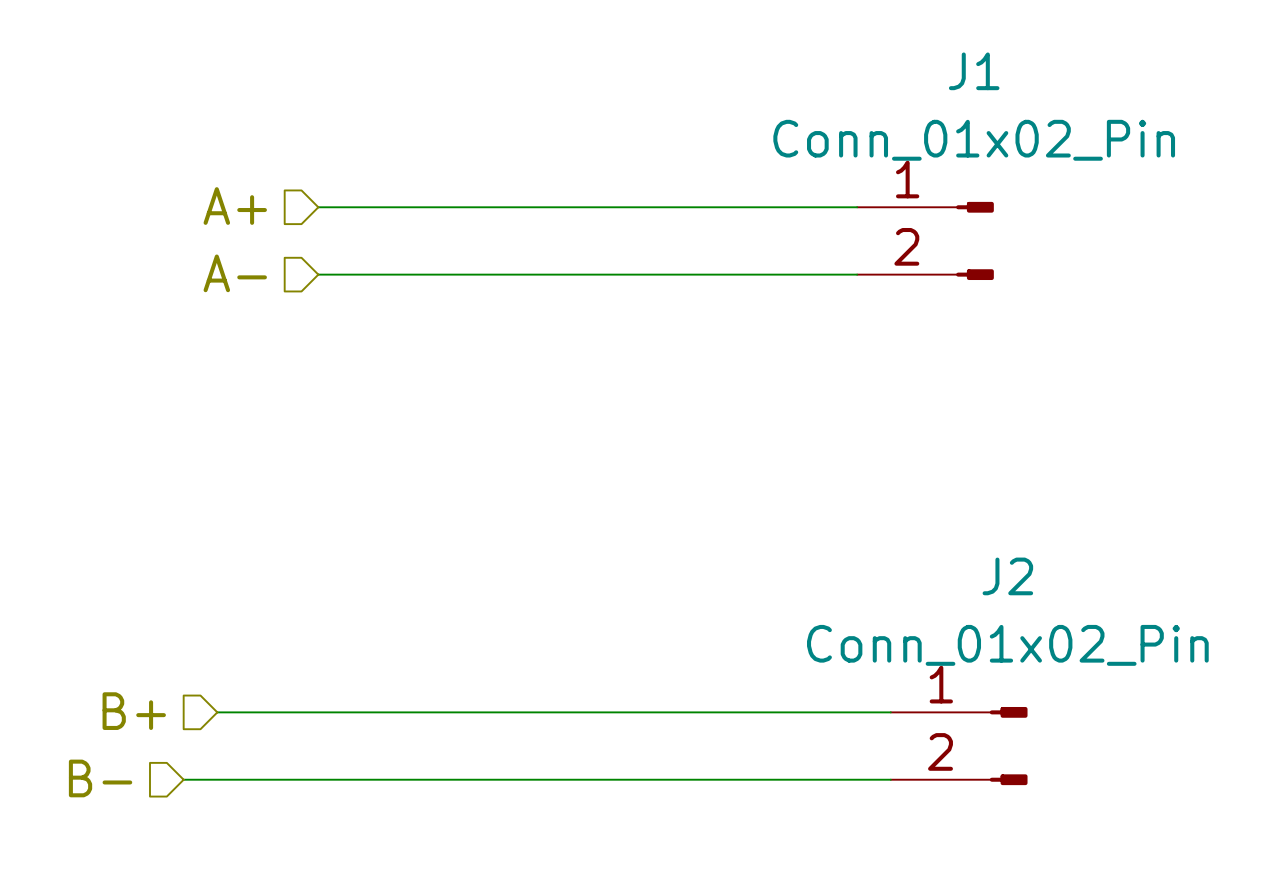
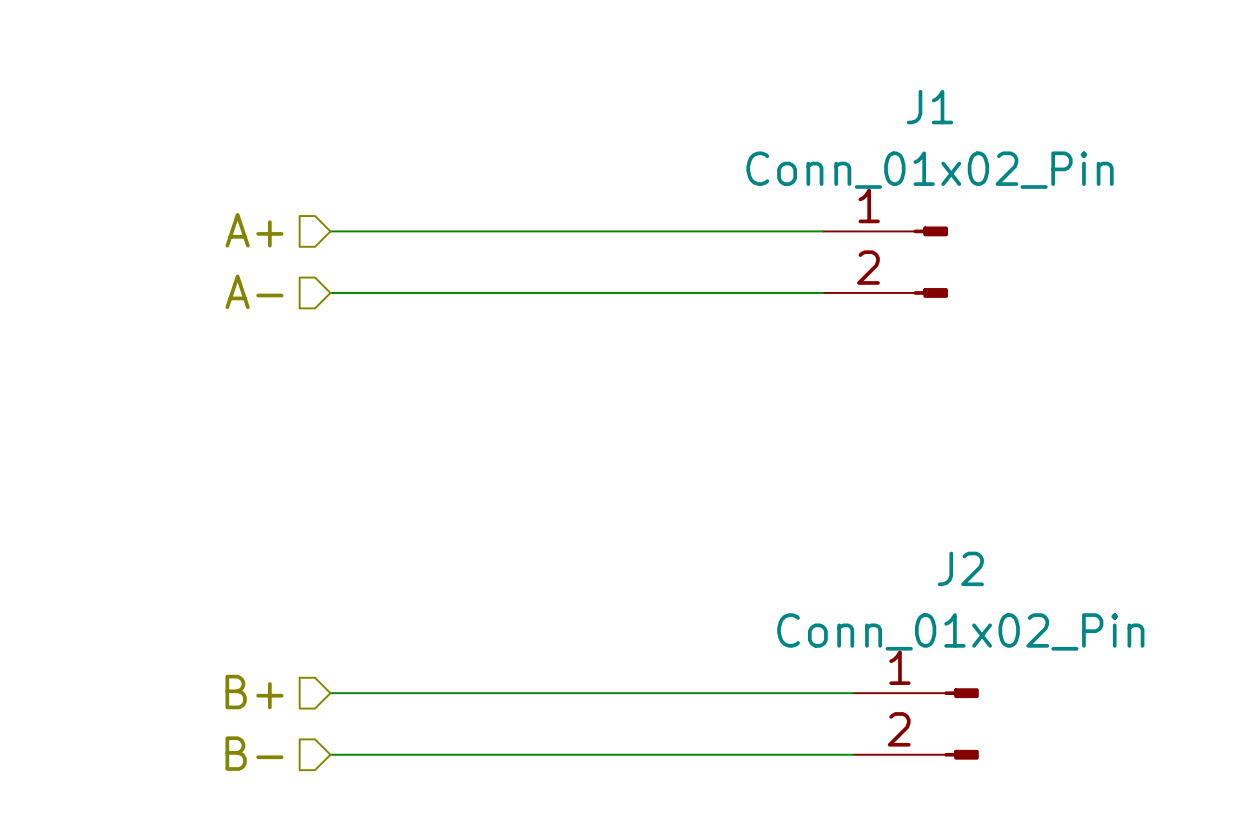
hierarchical label position: B+ (134, 711) -> B+ (254, 692)
wire: (217, 712) (318, 712) -> none
hierarchical label position: B- (100, 778) -> B- (254, 753)
wire: (183, 779) (318, 779) -> none

